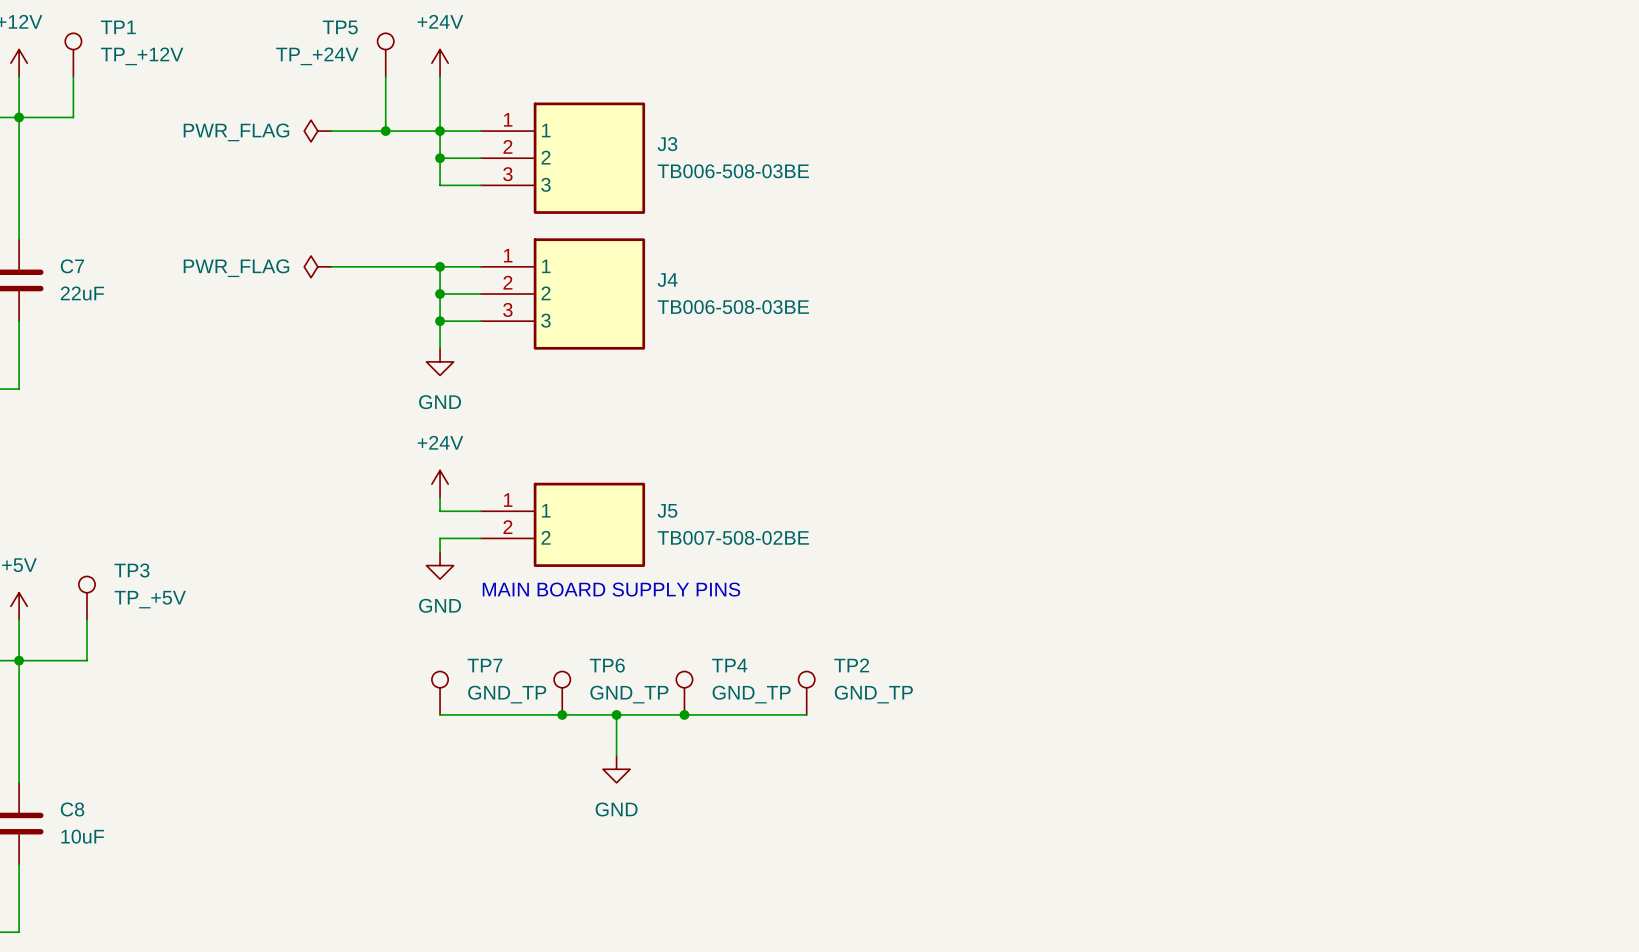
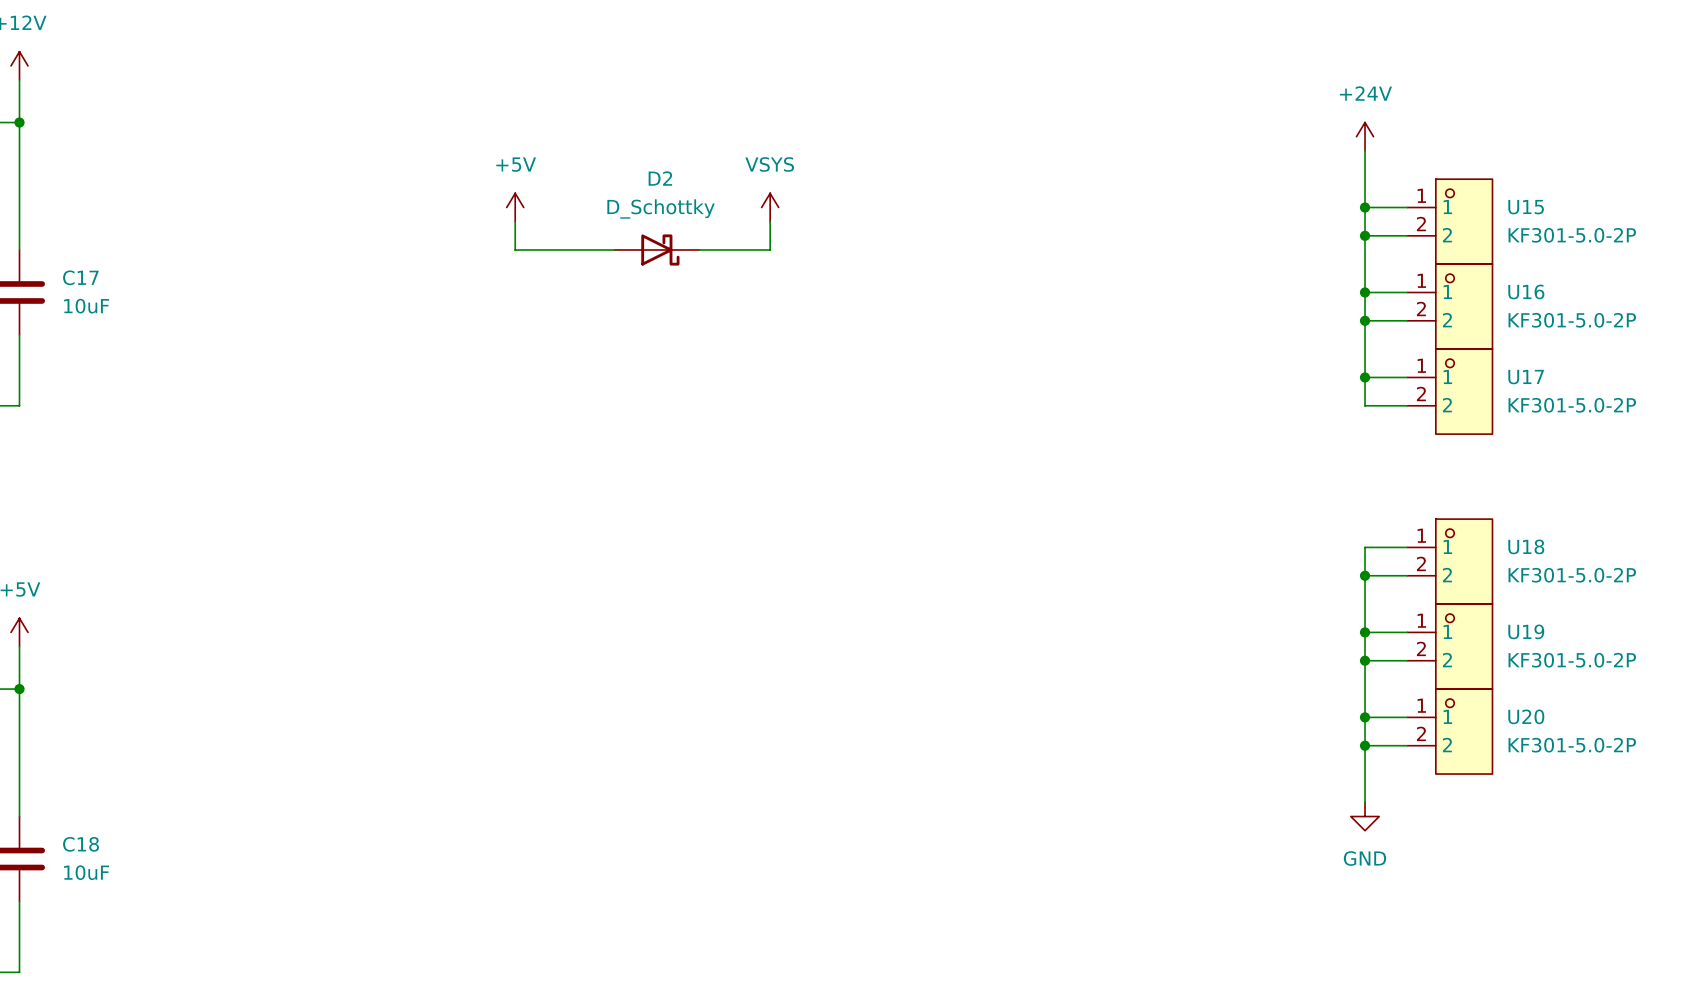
TP1: TP_+12V (73, 55) -> none
TP5: TP_+24V (385, 55) -> none
power symbol: +24V (440, 63) -> none
wire: (73, 76) (73, 117) (19, 117) -> none
wire: (385, 76) (385, 131) -> none
wire: (440, 76) (440, 185) (480, 185) -> none
power symbol: PWR_FLAG (317, 131) -> none
wire: (331, 131) (480, 131) -> none
junction: (385, 131) -> none
junction: (440, 131) -> none
power symbol: none -> +24V (1365, 136)
wire: none -> (1365, 150) (1365, 405) (1407, 405)
wire: (440, 158) (480, 158) -> none
junction: (440, 158) -> none
J3: TB006-508-03BE (562, 158) -> none
power symbol: none -> +5V (515, 207)
power symbol: none -> VSYS (770, 207)
wire: none -> (1365, 207) (1407, 207)
junction: none -> (1365, 207)
wire: none -> (515, 221) (515, 250) (614, 250)
wire: none -> (770, 221) (770, 250) (699, 250)
U15: none -> KF301-5.0-2P (1449, 221)
wire: none -> (1365, 235) (1407, 235)
junction: none -> (1365, 235)
D2: none -> D_Schottky (656, 250)
C7 name: C7 (72, 266) -> C17 (80, 277)
power symbol: PWR_FLAG (317, 266) -> none
wire: (331, 266) (480, 266) -> none
wire: (440, 266) (440, 348) -> none
junction: (440, 266) -> none
wire: none -> (1365, 292) (1407, 292)
junction: none -> (1365, 292)
C7 value: 22uF (82, 293) -> 10uF (86, 306)
wire: (440, 294) (480, 294) -> none
junction: (440, 294) -> none
J4: TB006-508-03BE (562, 294) -> none
U16: none -> KF301-5.0-2P (1449, 306)
wire: none -> (1365, 320) (1407, 320)
junction: none -> (1365, 320)
wire: (440, 321) (480, 321) -> none
junction: (440, 321) -> none
power symbol: GND (440, 361) -> none
wire: none -> (1365, 377) (1407, 377)
junction: none -> (1365, 377)
U17: none -> KF301-5.0-2P (1449, 391)
power symbol: +24V (440, 484) -> none
wire: (440, 497) (440, 511) (480, 511) -> none
J5: TB007-508-02BE (562, 524) -> none
wire: none -> (1407, 547) (1365, 547) (1365, 802)
wire: (480, 538) (440, 538) (440, 552) -> none
U18: none -> KF301-5.0-2P (1449, 561)
wire: none -> (1365, 575) (1407, 575)
junction: none -> (1365, 575)
power symbol: GND (440, 565) -> none
text: MAIN BOARD SUPPLY PINS (611, 589) -> none
TP3: TP_+5V (86, 598) -> none
wire: none -> (1365, 632) (1407, 632)
junction: none -> (1365, 632)
wire: (86, 619) (86, 660) (19, 660) -> none
U19: none -> KF301-5.0-2P (1449, 646)
wire: none -> (1365, 660) (1407, 660)
junction: none -> (1365, 660)
wire: none -> (1365, 717) (1407, 717)
junction: none -> (1365, 717)
TP7: GND_TP (440, 693) -> none
TP6: GND_TP (562, 693) -> none
TP4: GND_TP (684, 693) -> none
TP2: GND_TP (806, 693) -> none
U20: none -> KF301-5.0-2P (1449, 731)
wire: (440, 714) (806, 714) -> none
junction: (562, 714) -> none
wire: (616, 714) (616, 755) -> none
junction: (616, 714) -> none
junction: (684, 714) -> none
wire: none -> (1365, 745) (1407, 745)
junction: none -> (1365, 745)
power symbol: GND (616, 769) -> none
power symbol: none -> GND (1365, 816)
C8 name: C8 (72, 809) -> C18 (81, 844)

